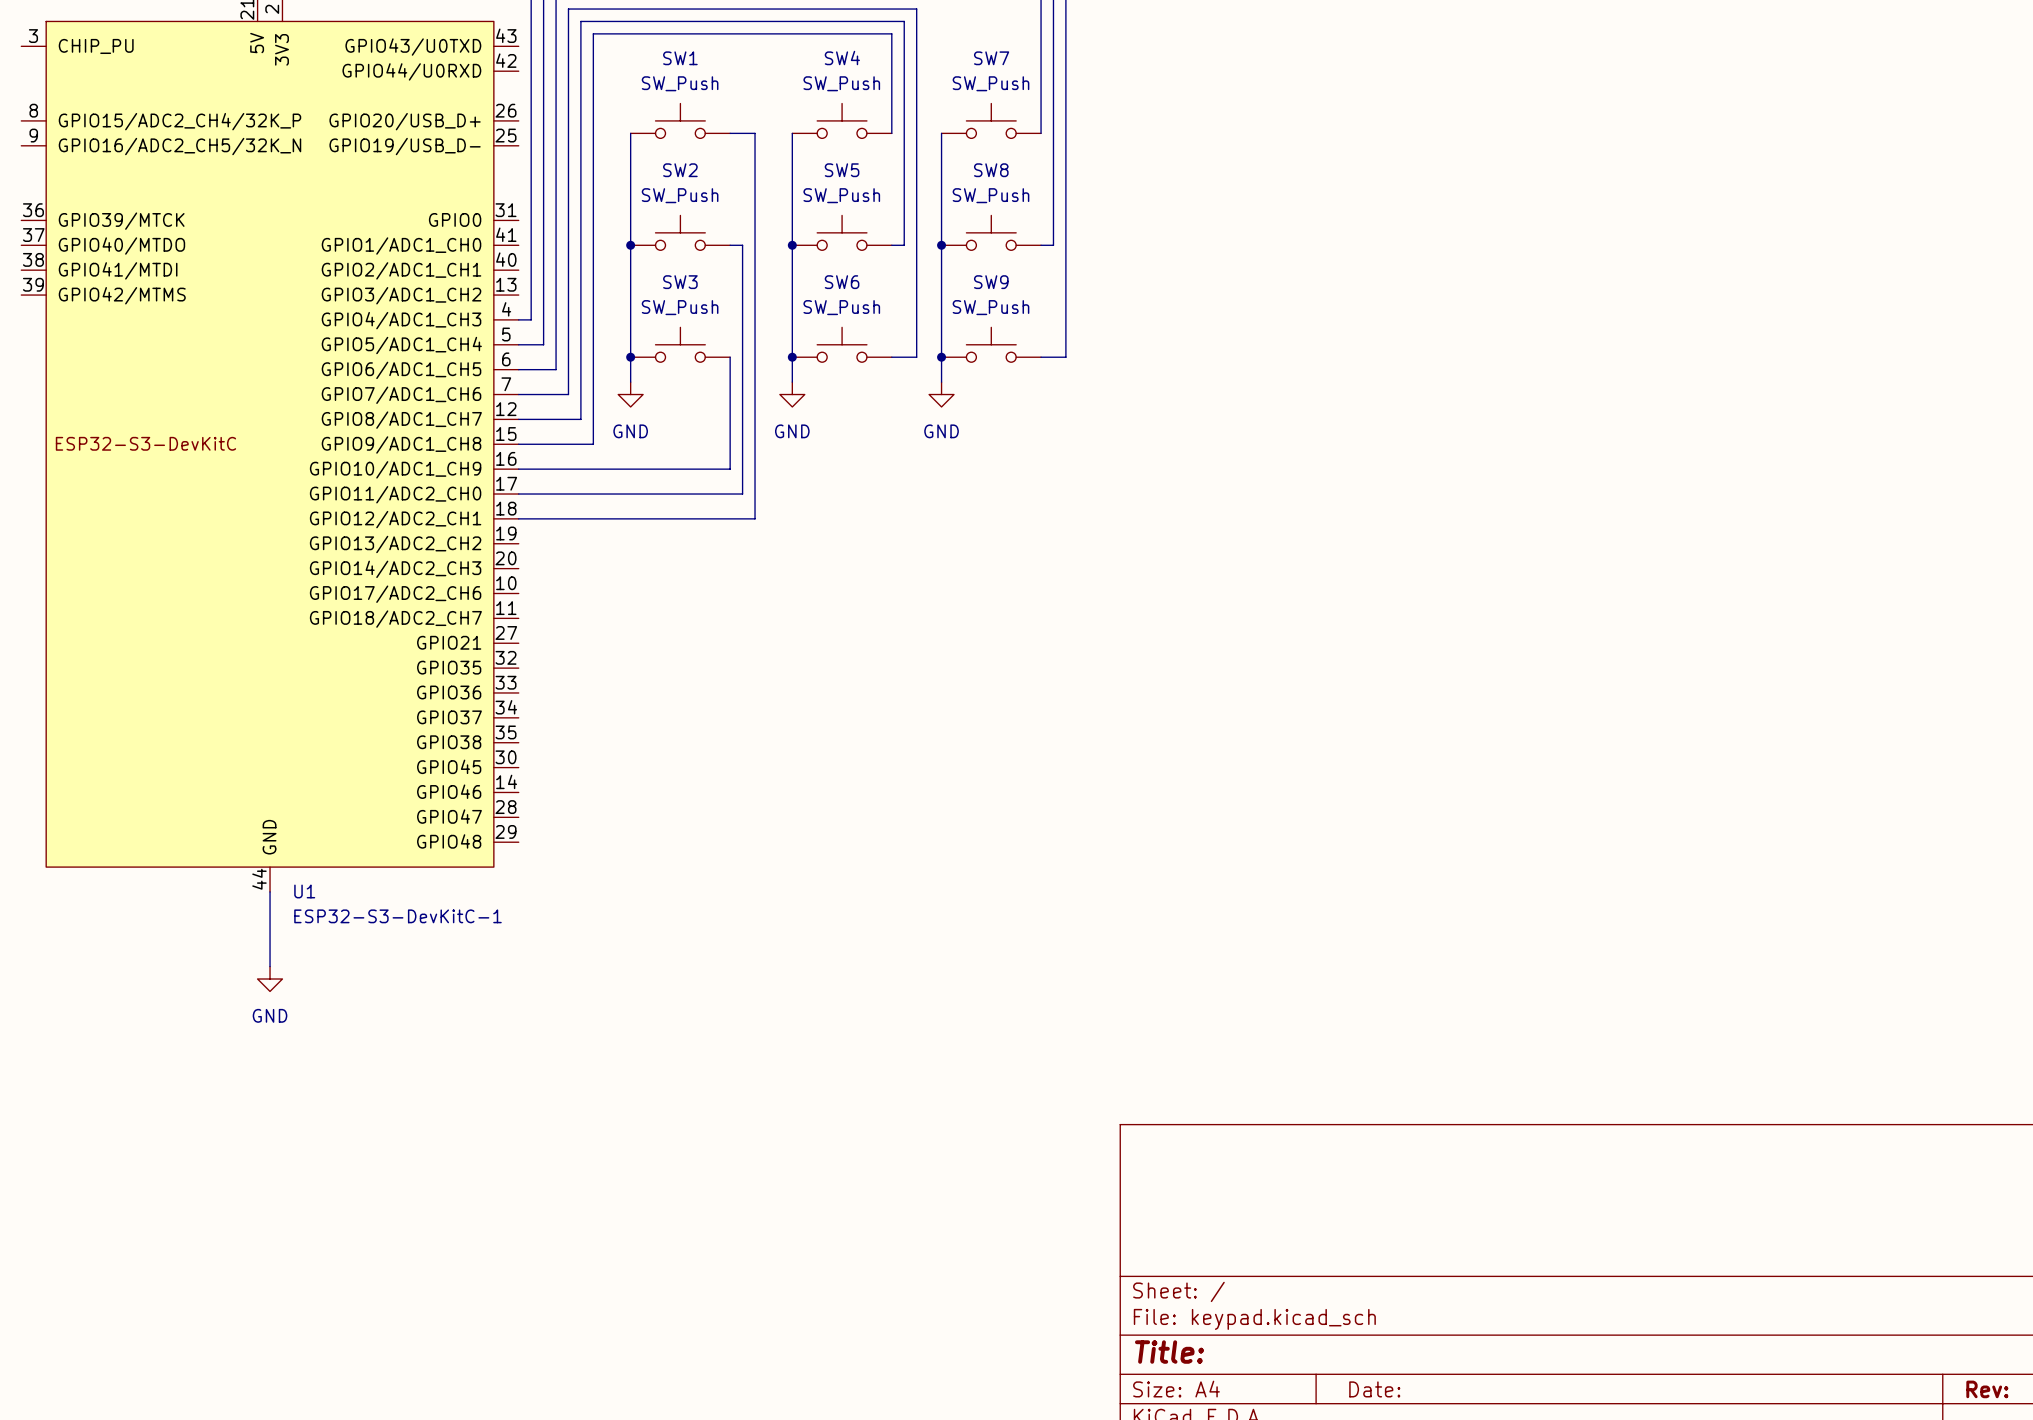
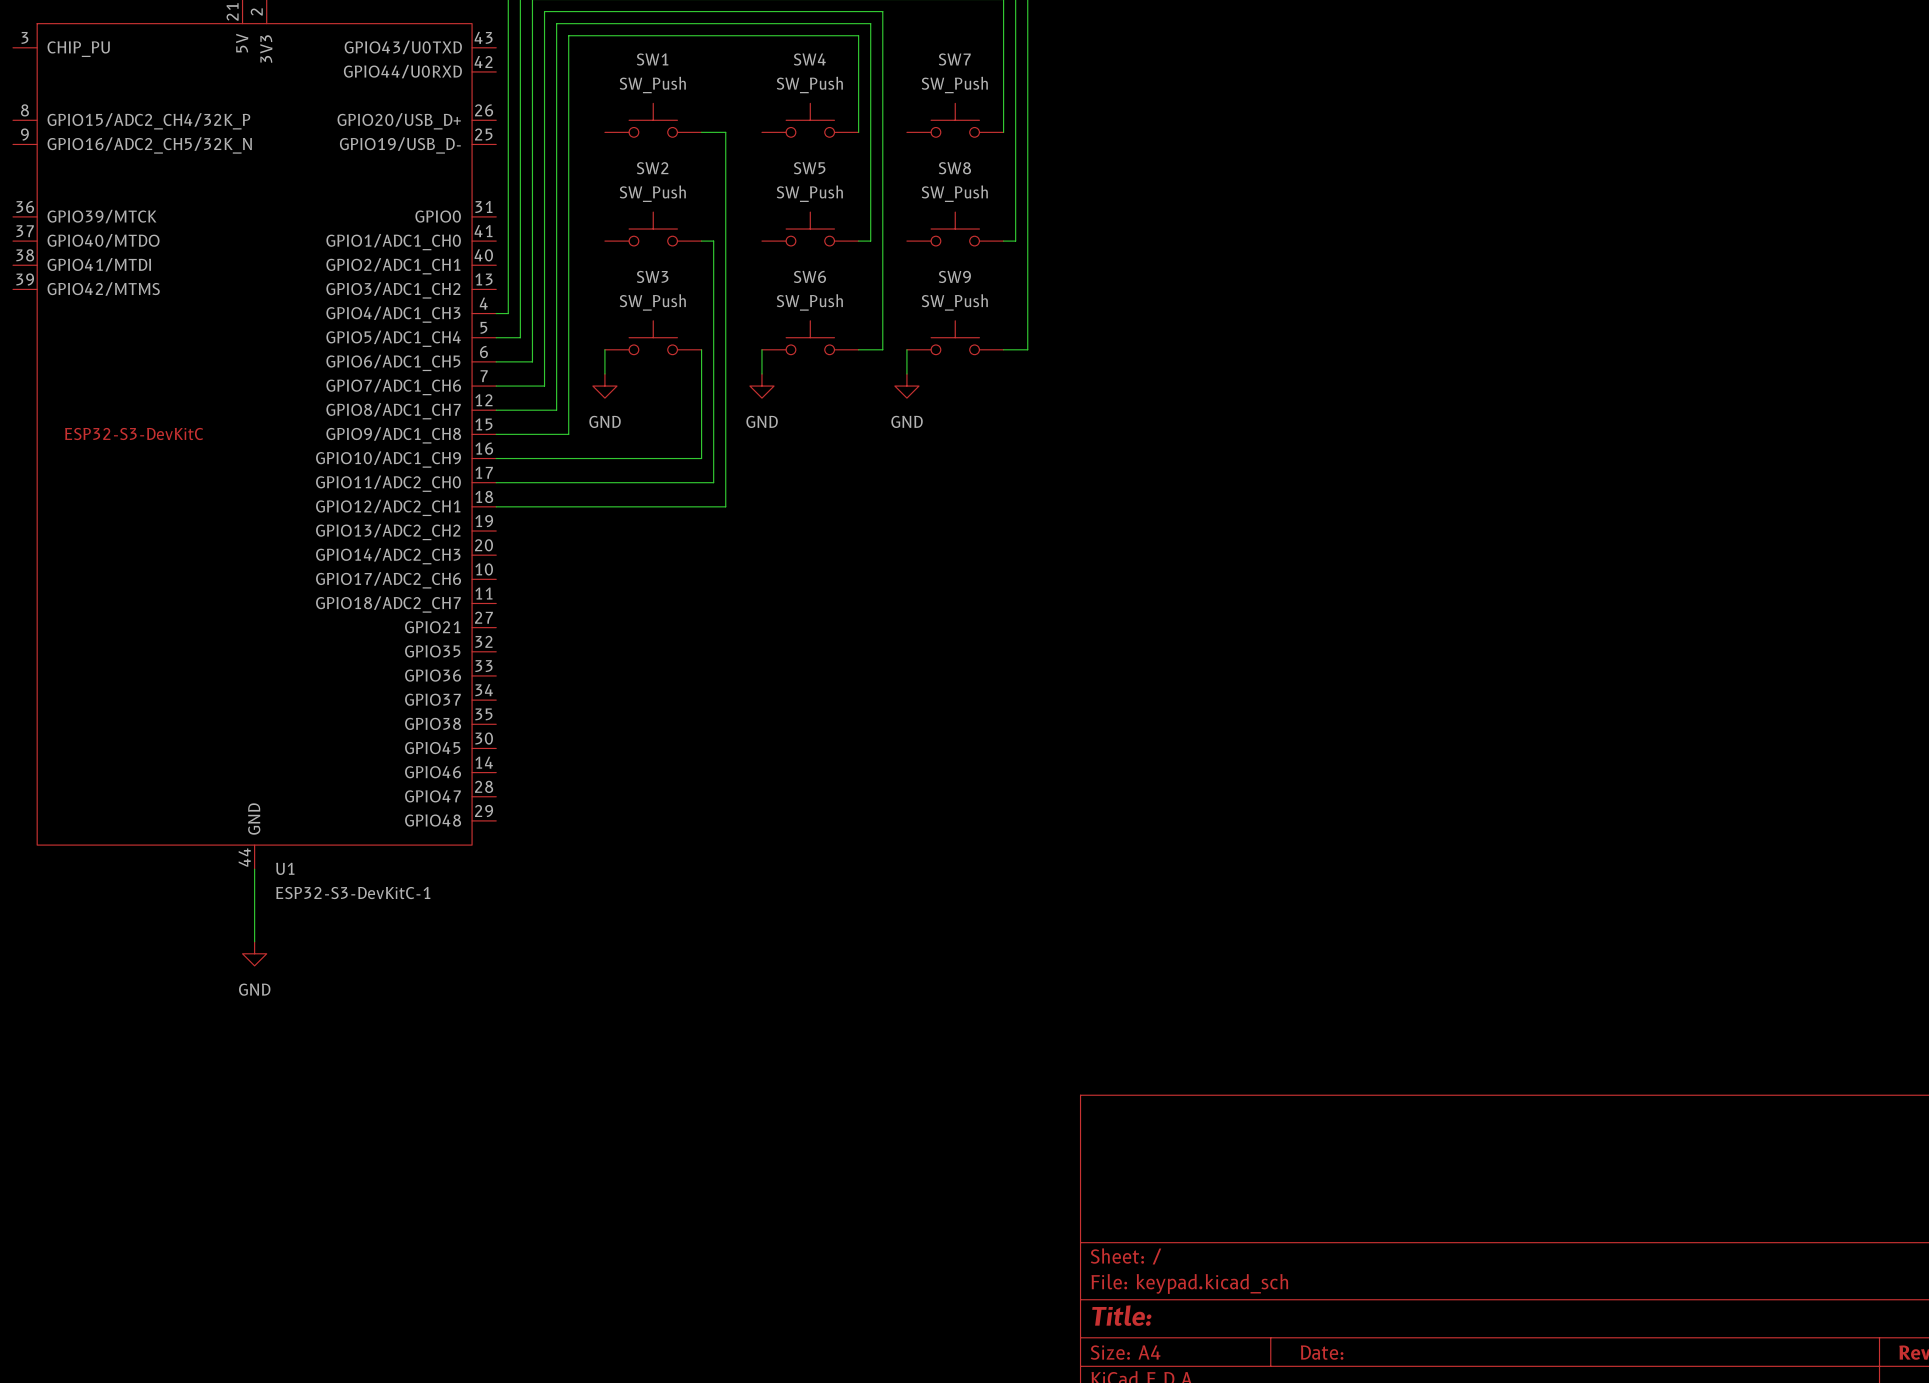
wire: (630, 133) (630, 357) -> none
wire: (792, 133) (792, 357) -> none
wire: (941, 133) (941, 357) -> none
junction: (630, 245) -> none
junction: (792, 245) -> none
junction: (941, 245) -> none
junction: (630, 357) -> none
junction: (792, 357) -> none
junction: (941, 357) -> none

